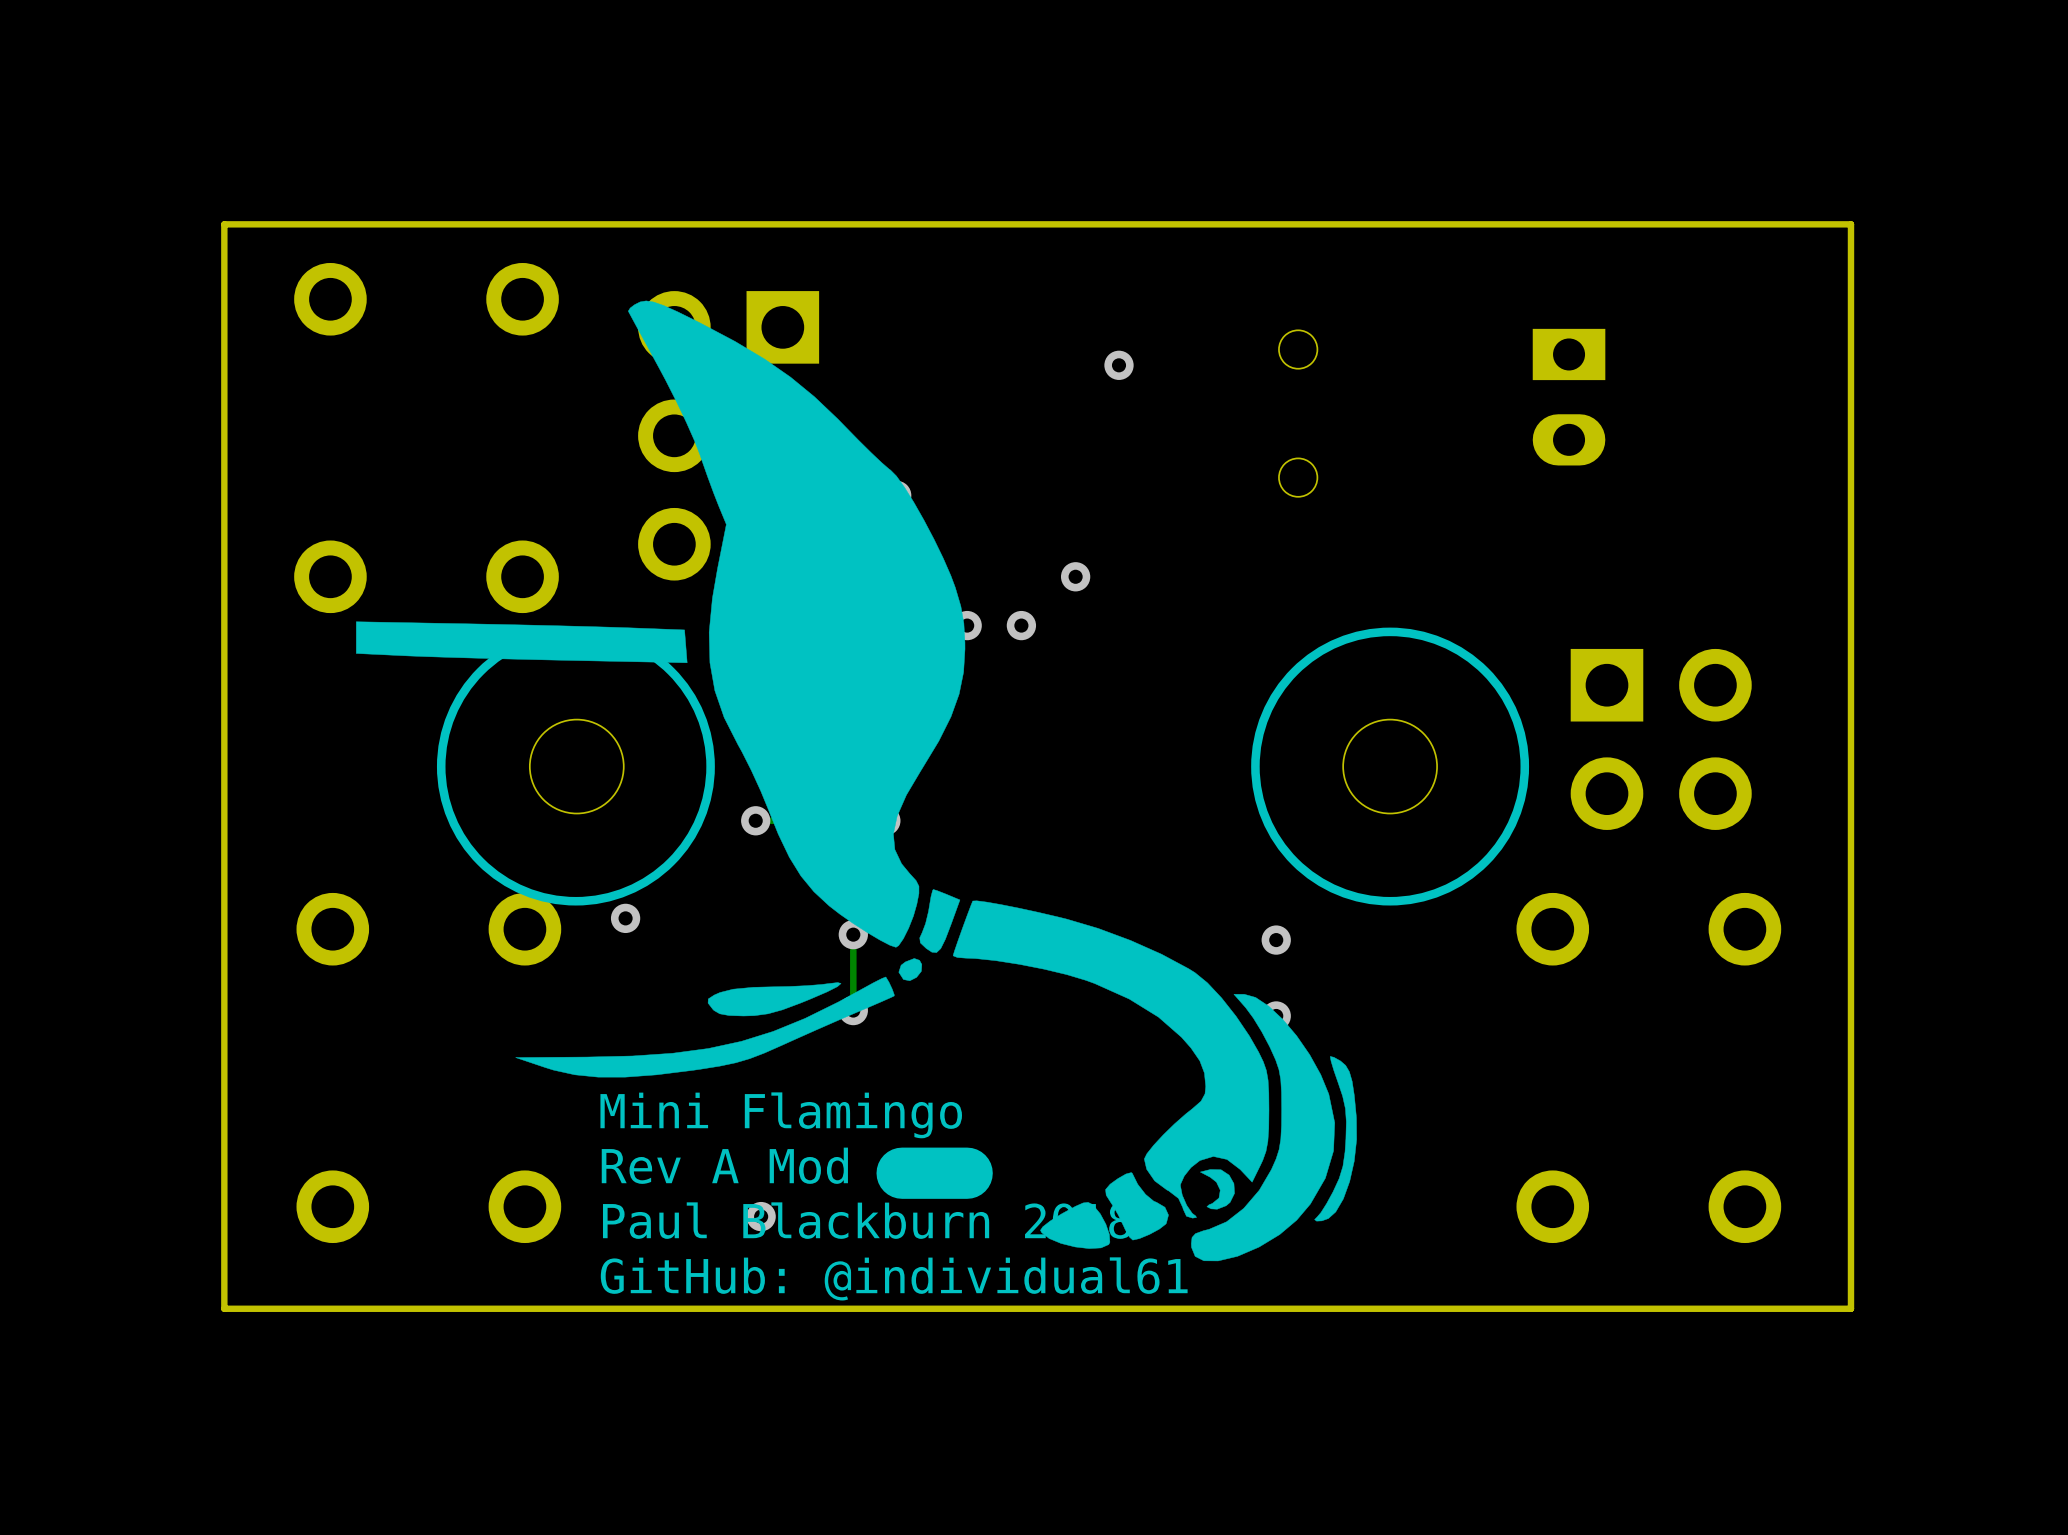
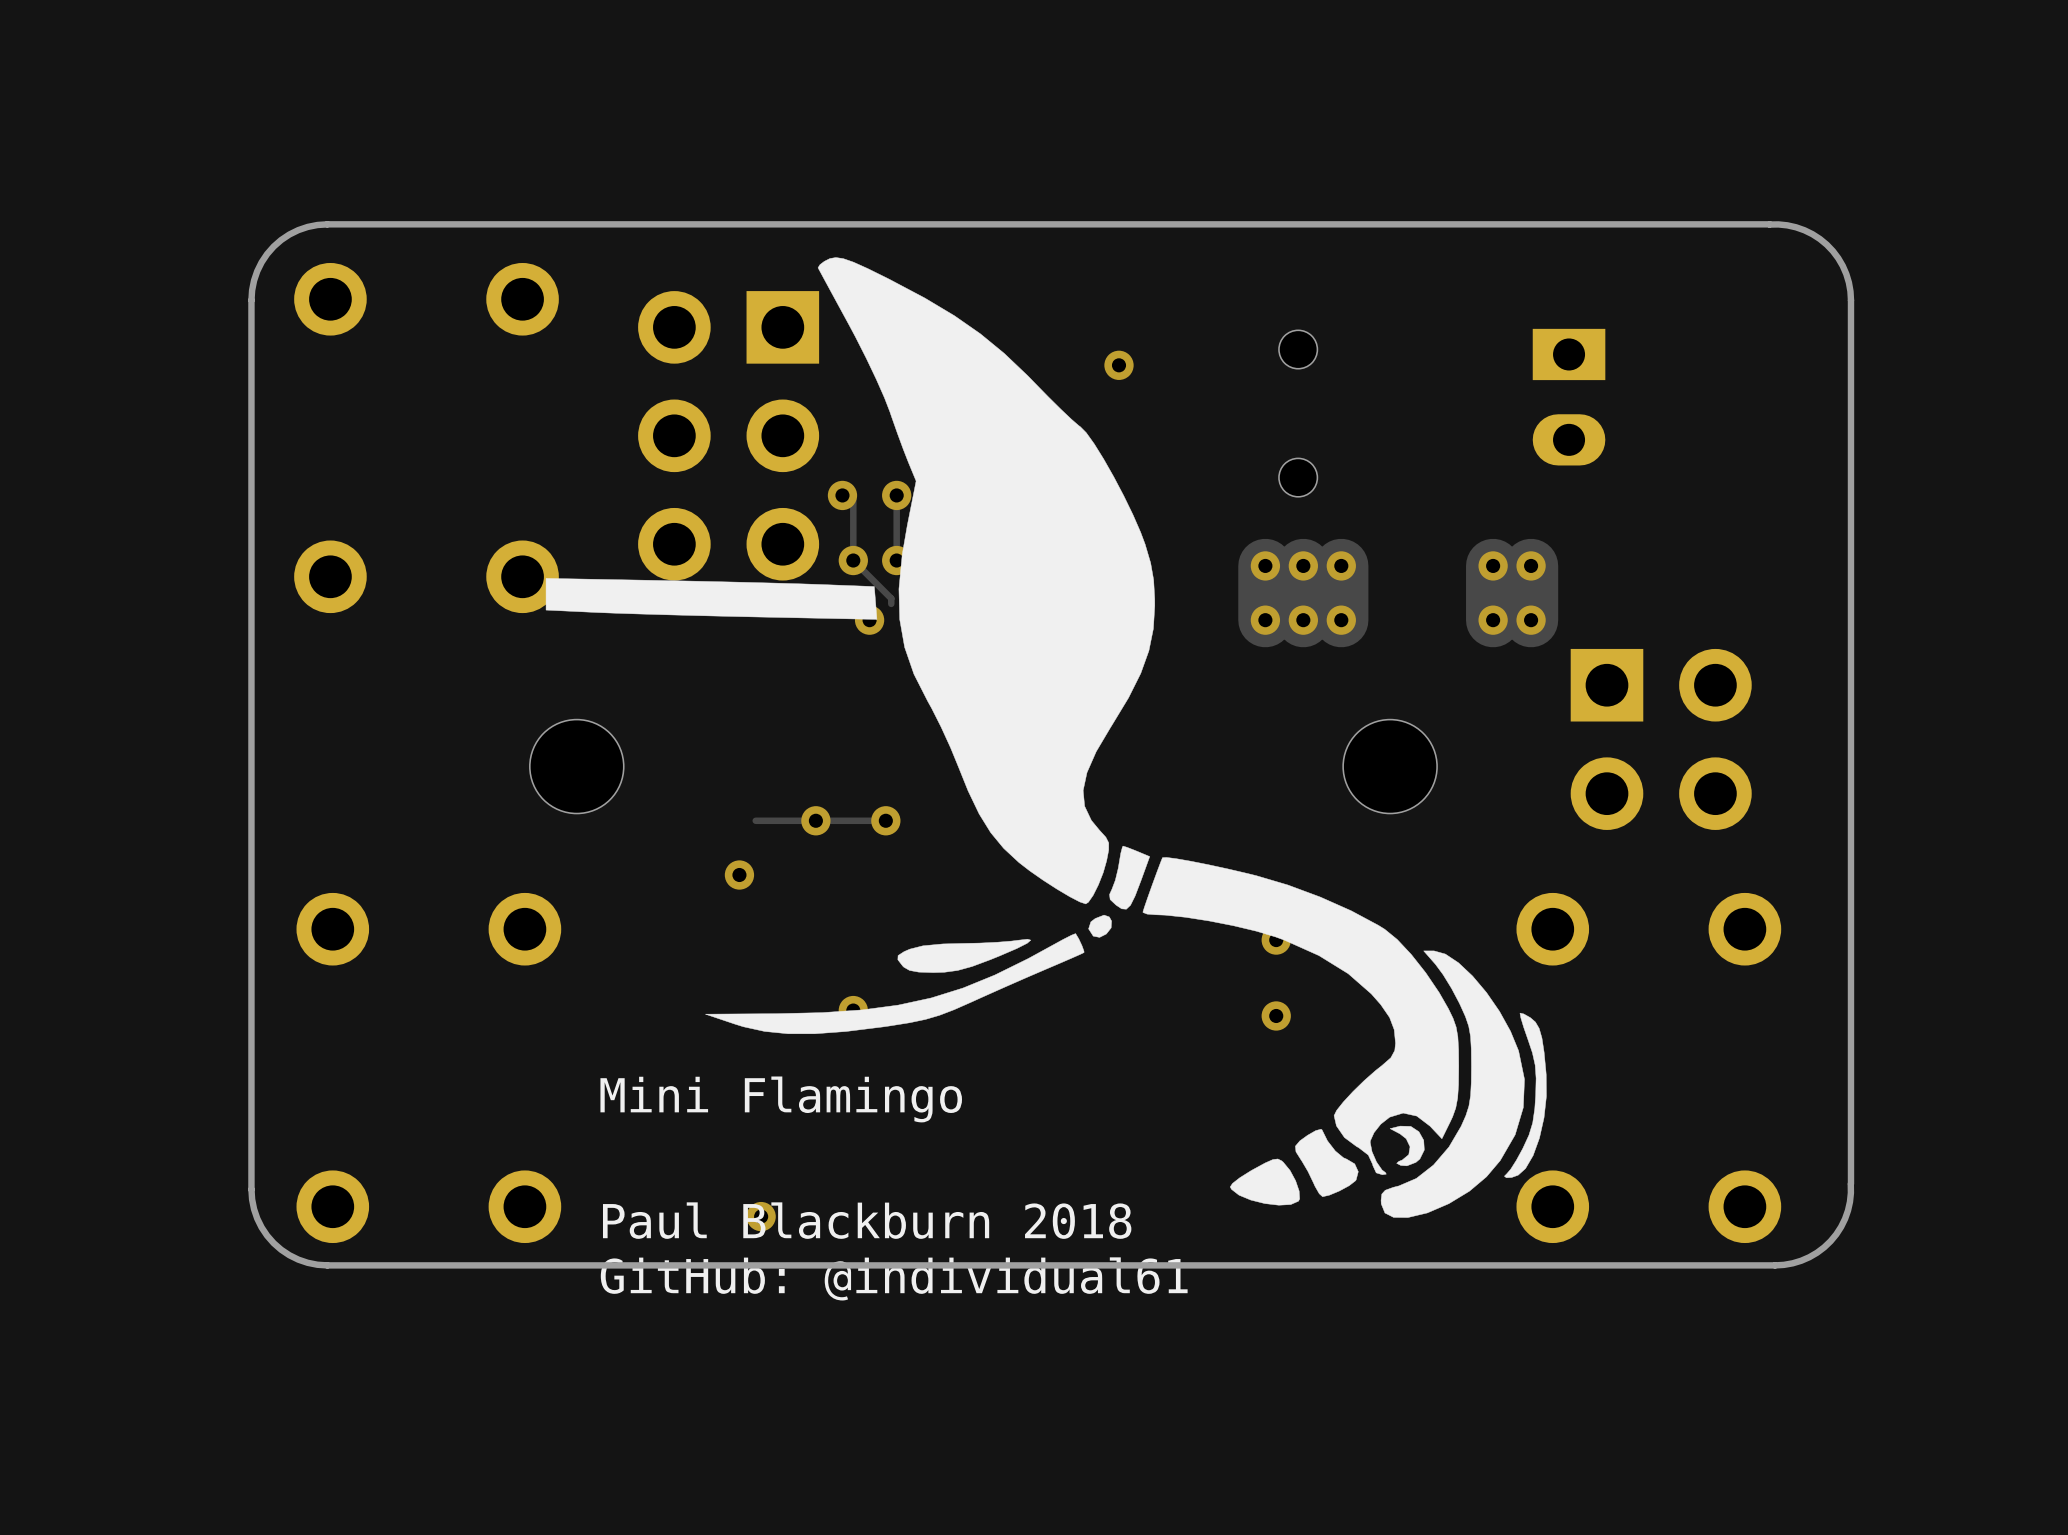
board edge: (327, 224) (224, 224) (224, 1308) (1850, 1308) (1850, 1184) -> (327, 224) (298, 230) (273, 246) (257, 271) (251, 300) (251, 1189) (254, 1209) (261, 1227) (273, 1243) (289, 1255) (307, 1262) (327, 1265) (1775, 1265) (1792, 1263) (1809, 1257) (1830, 1241) (1845, 1218) (1849, 1201) (1850, 1184)
board edge: (1769, 224) (1850, 224) (1850, 300) -> (1769, 224) (1796, 227) (1812, 234) (1826, 244) (1842, 265) (1848, 282) (1850, 300)
track: none -> (853, 495) (853, 560) (891, 598) (891, 603)
via: none -> (853, 560)
track: none -> (1265, 565) (1265, 620)
via: none -> (1265, 565)
track: none -> (1303, 565) (1303, 620)
via: none -> (1303, 565)
track: none -> (1341, 565) (1341, 620)
via: none -> (1341, 565)
track: none -> (1493, 565) (1493, 620)
via: none -> (1493, 565)
track: none -> (1531, 565) (1531, 620)
via: none -> (1531, 565)
via: none -> (1265, 620)
via: none -> (1303, 620)
via: none -> (1341, 620)
via: none -> (1493, 620)
via: none -> (1531, 620)
drawing: [436, 627, 715, 906] -> none
drawing: [1251, 627, 1530, 906] -> none
drawing position: (856, 780) -> (1046, 737)
via: (755, 820) -> none
via: none -> (815, 820)
via: none -> (739, 875)
via: (625, 918) -> none
track: (853, 934) (853, 1010) -> none
via: (853, 934) -> none
text position: Mini Flamingo (781, 1115) -> Mini Flamingo (781, 1099)
text: Rev A Mod (724, 1165) -> none
line: (967, 1173) (902, 1173) -> none

